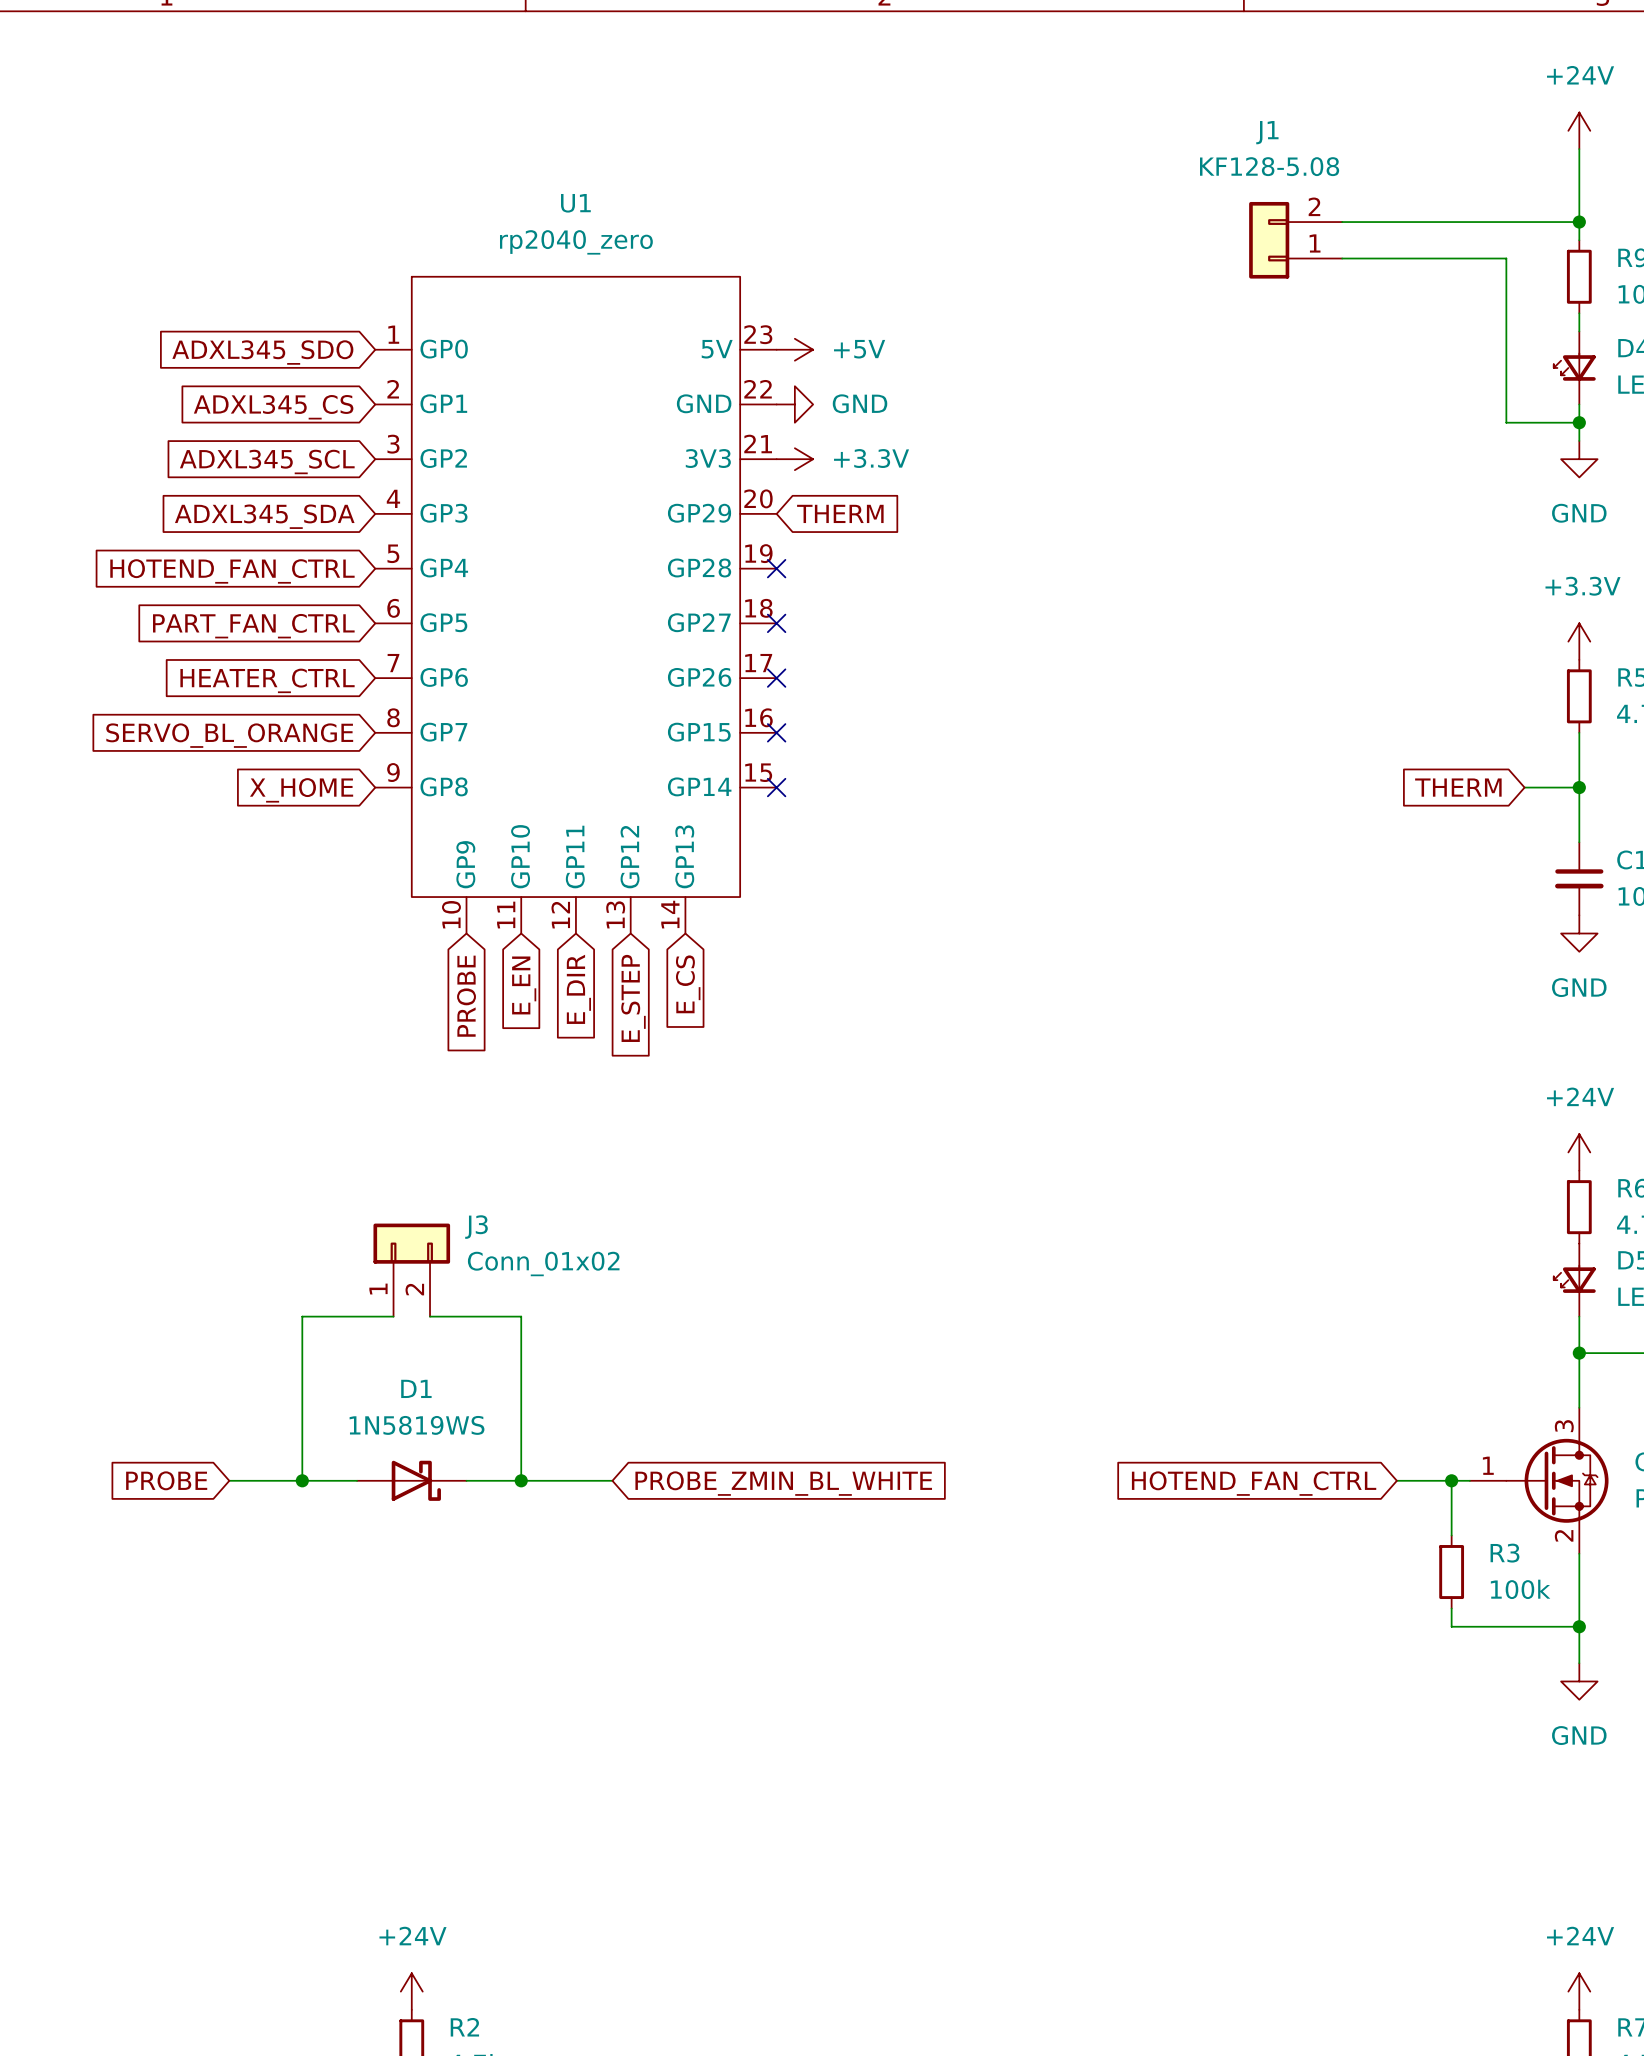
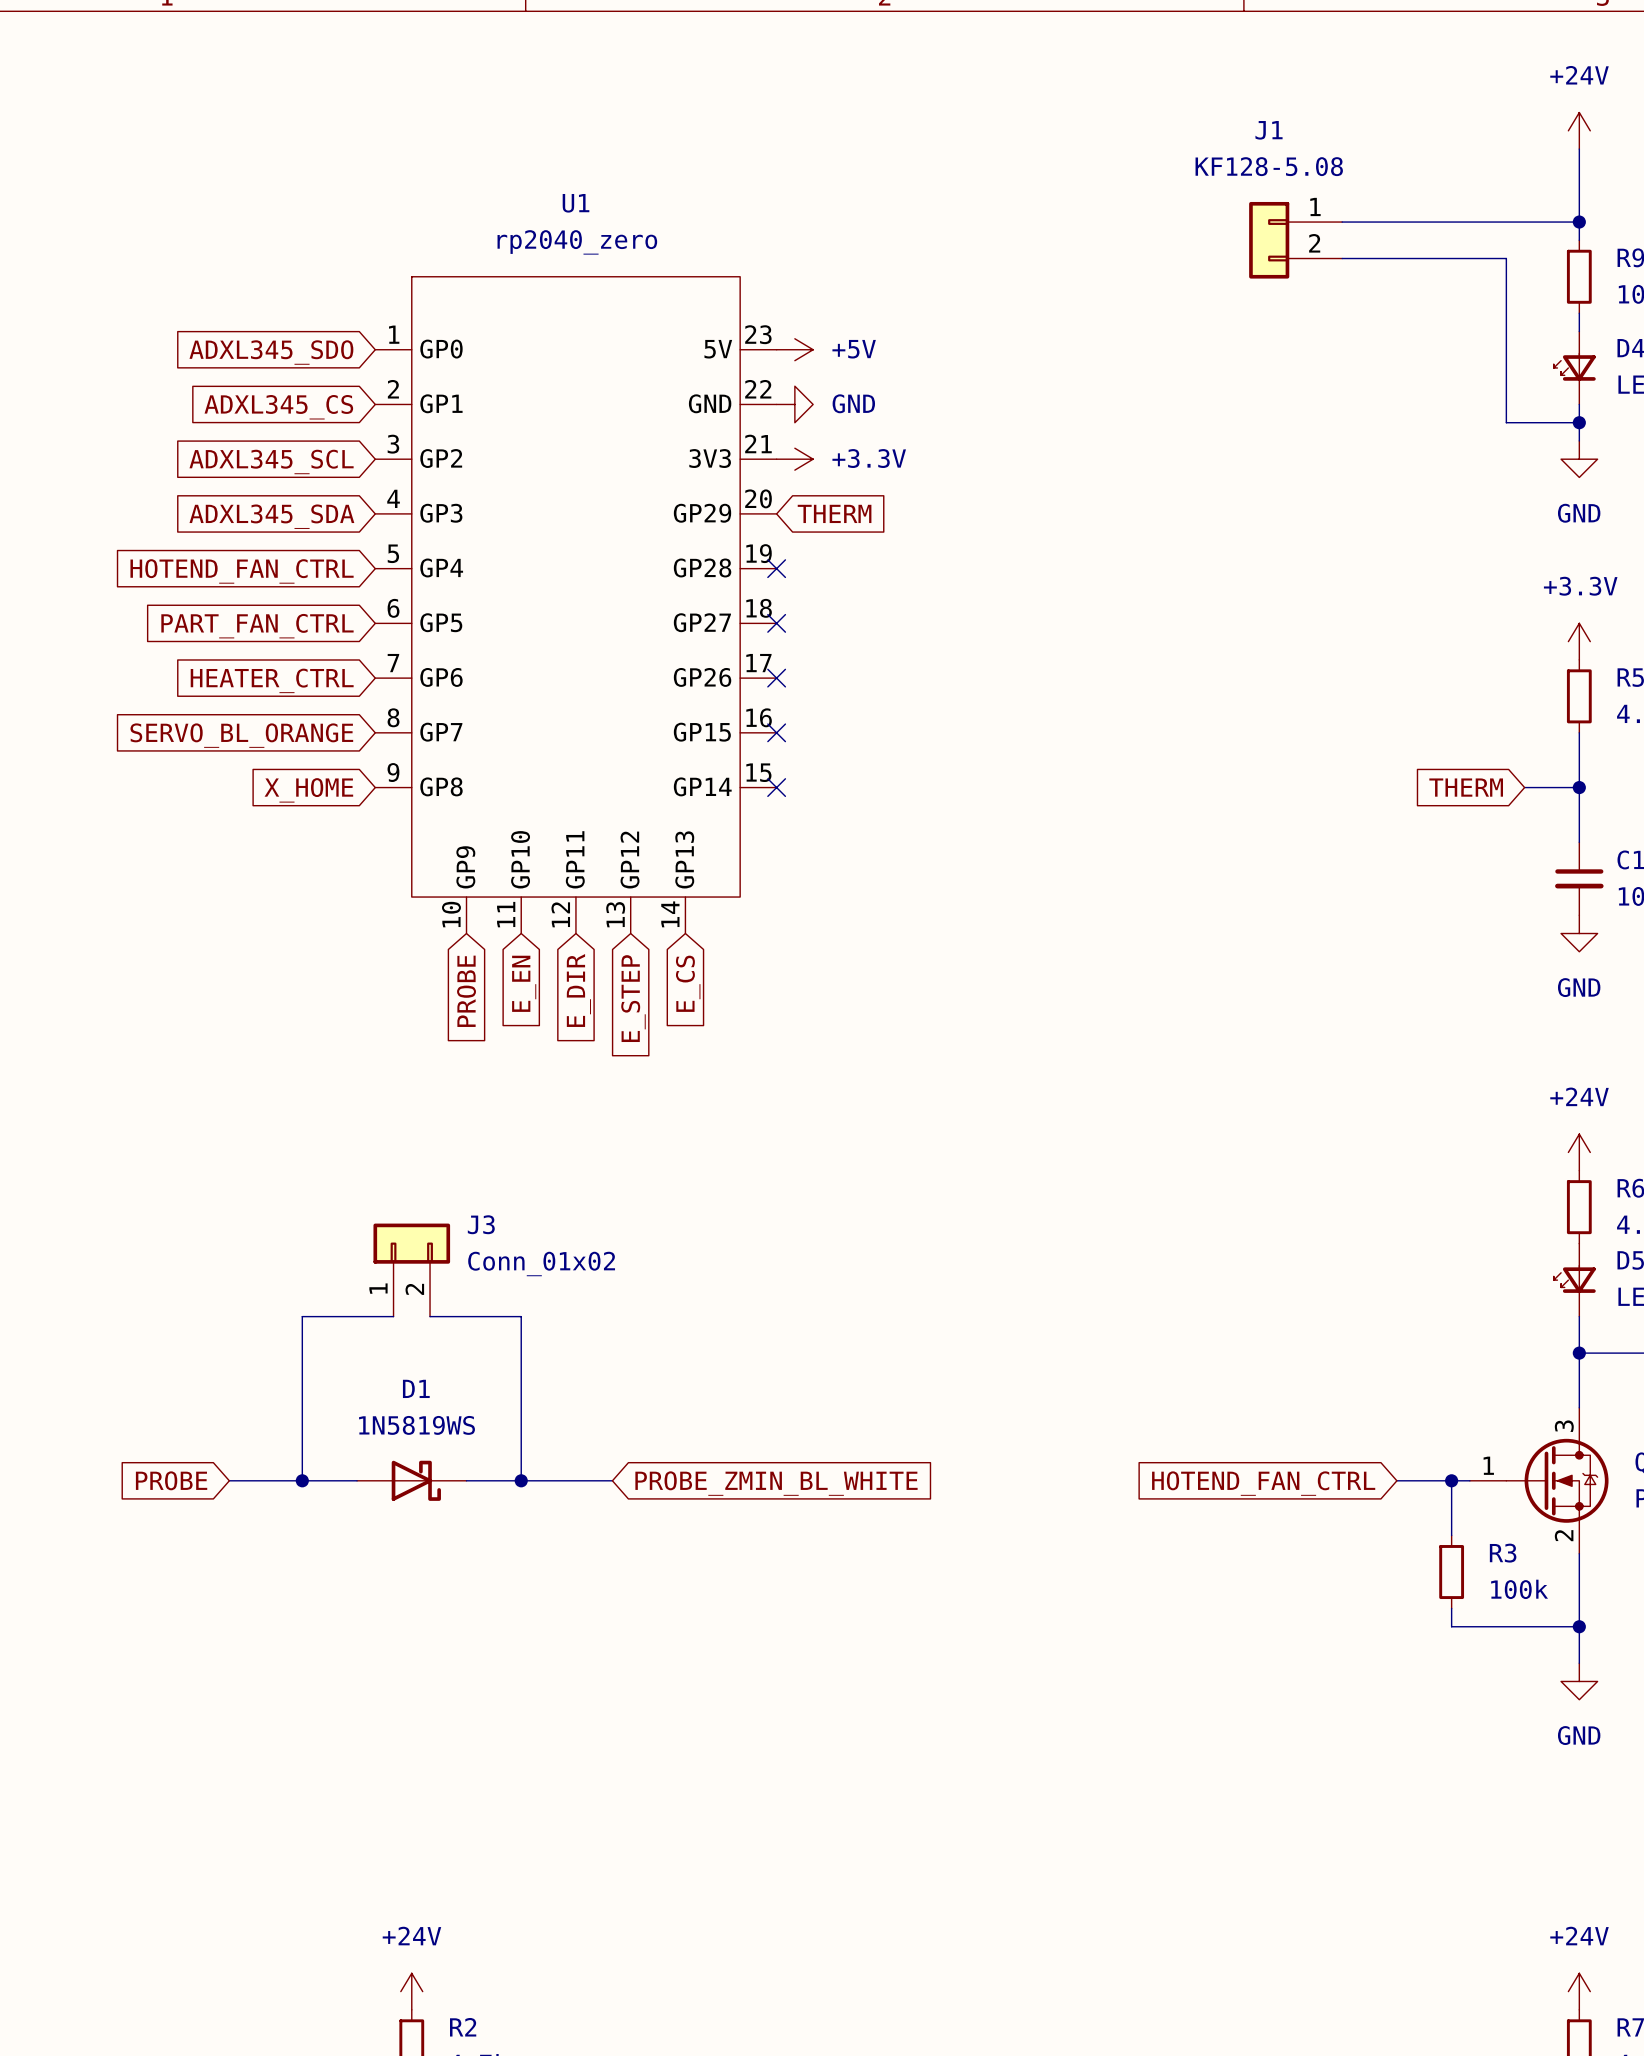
J1 flip: as is (1269, 240) -> up-down (1269, 240)

